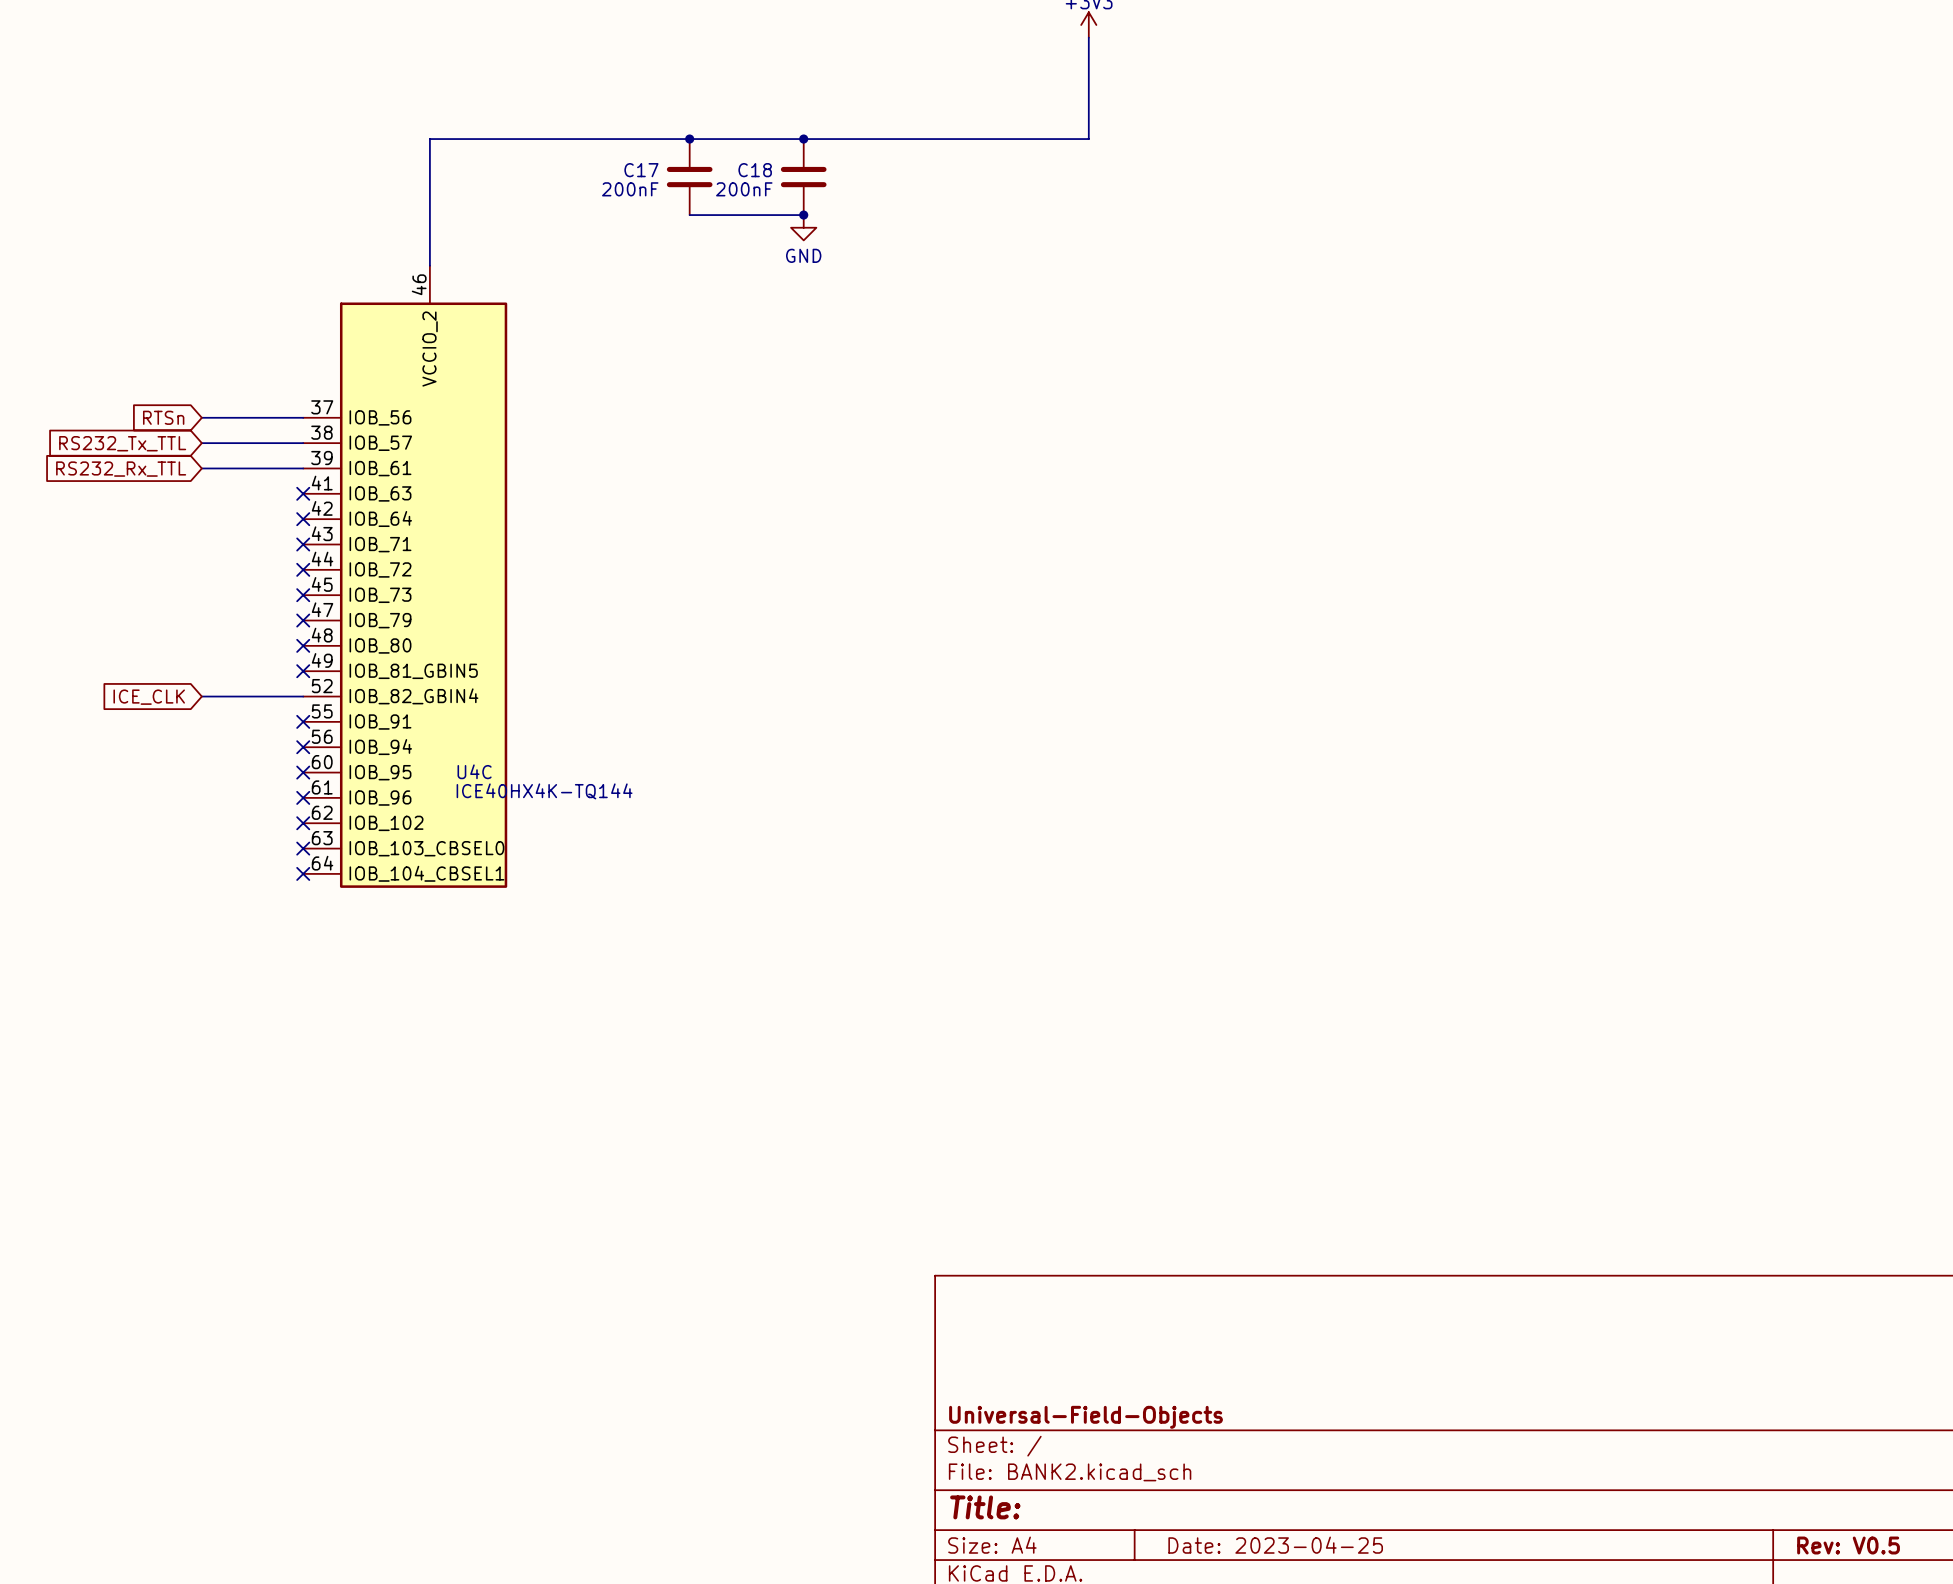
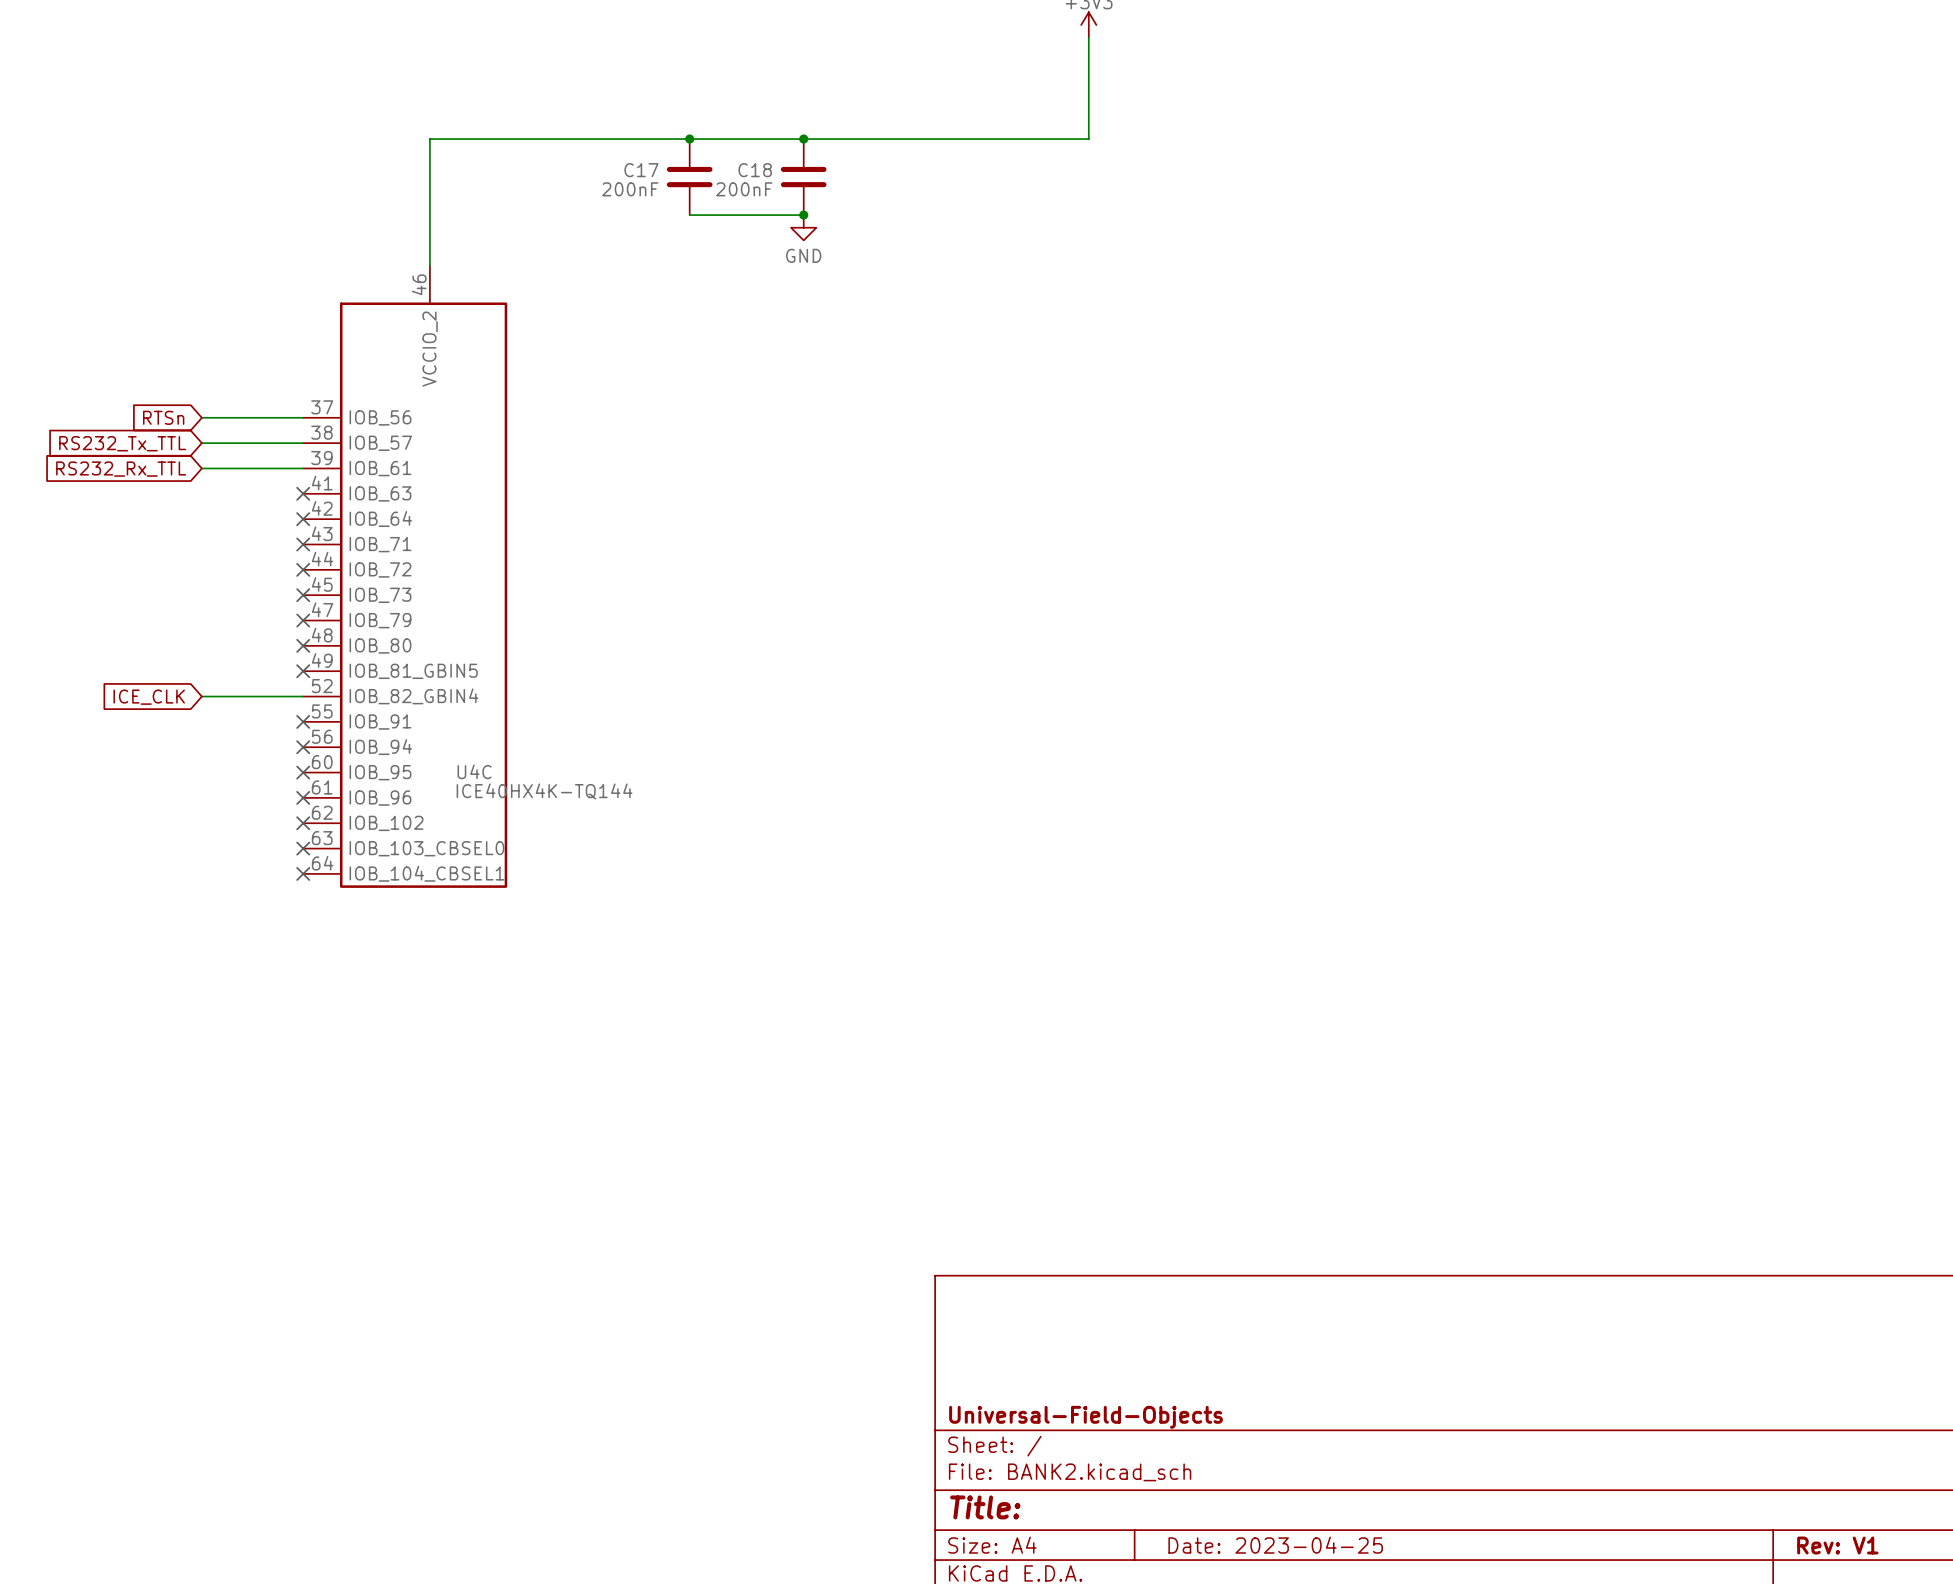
title block: Rev: V0.5 (1848, 1545) -> Rev: V1 (1837, 1545)

